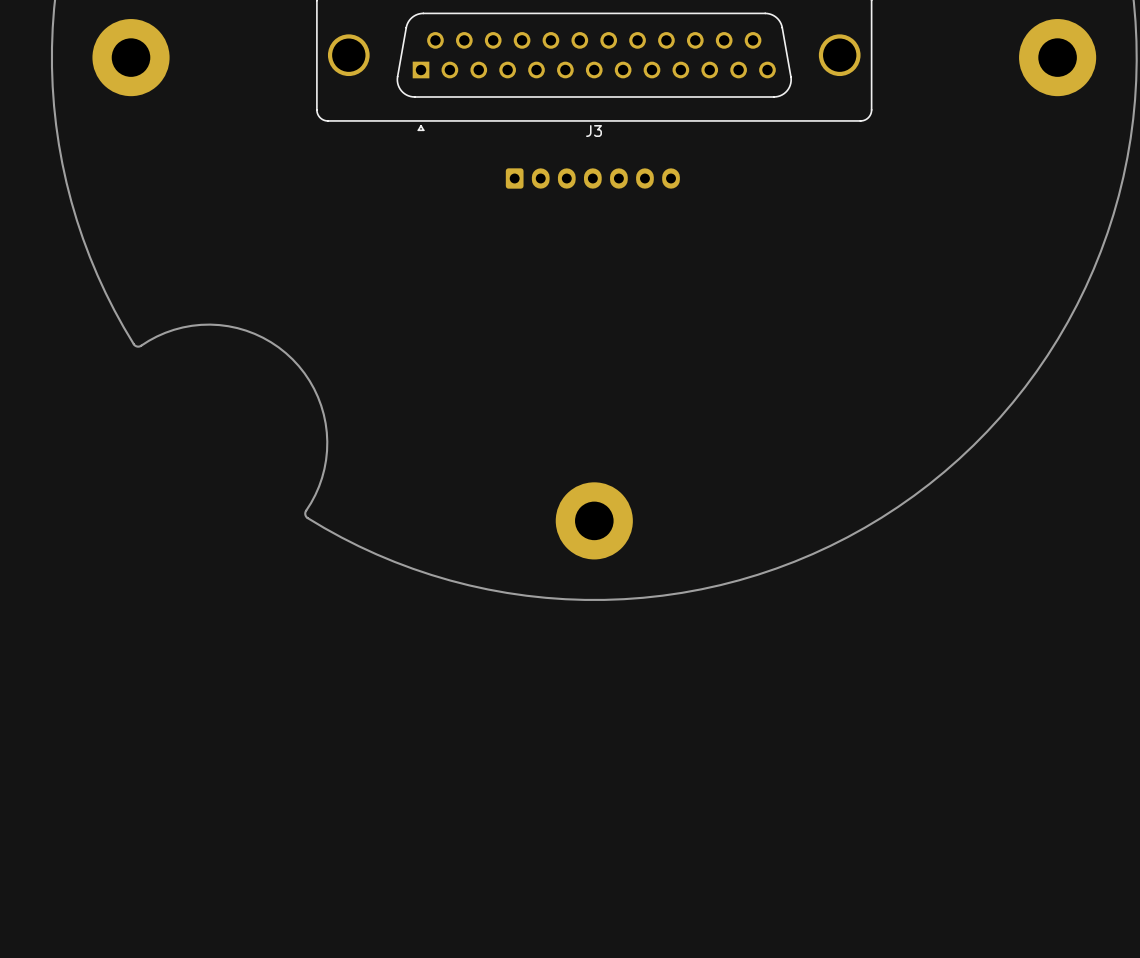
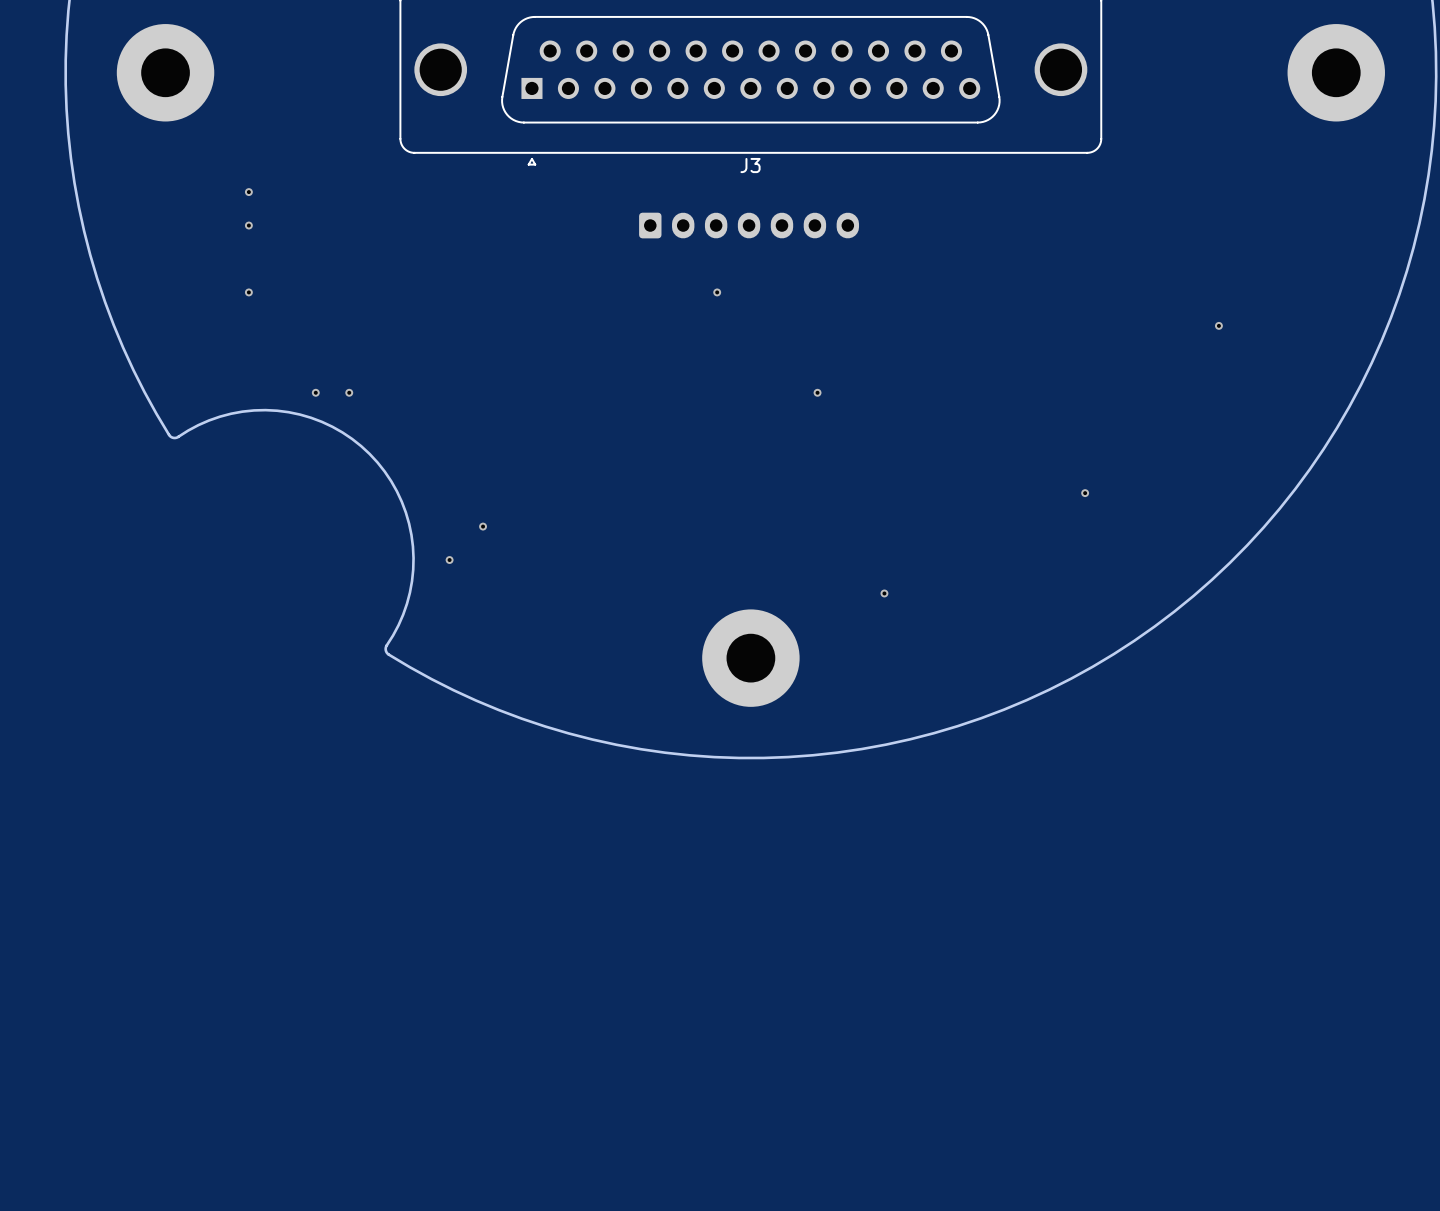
via: none -> (248, 192)
via: none -> (248, 225)
via: none -> (248, 292)
via: none -> (717, 292)
via: none -> (1218, 325)
via: none -> (315, 392)
via: none -> (349, 392)
via: none -> (817, 392)
via: none -> (1085, 493)
via: none -> (483, 526)
via: none -> (449, 560)
via: none -> (884, 593)

